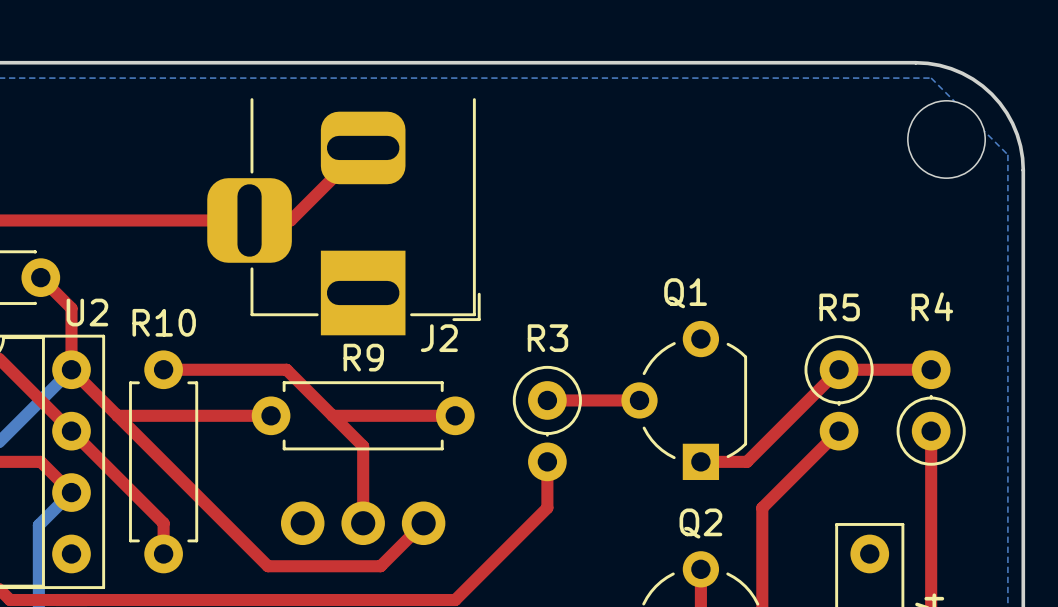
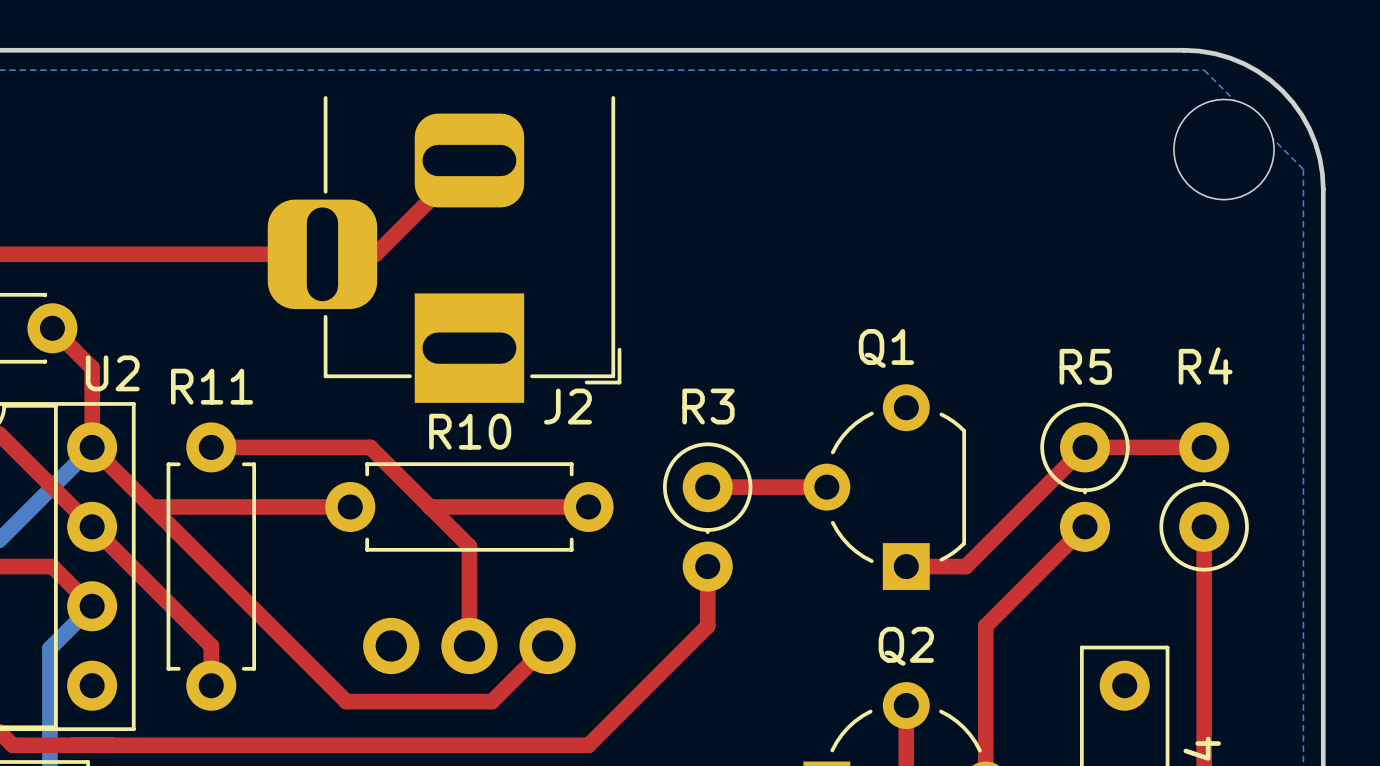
R10 name: R10 (164, 322) -> R11 (212, 386)
R9 name: R9 (363, 357) -> R10 (470, 431)

